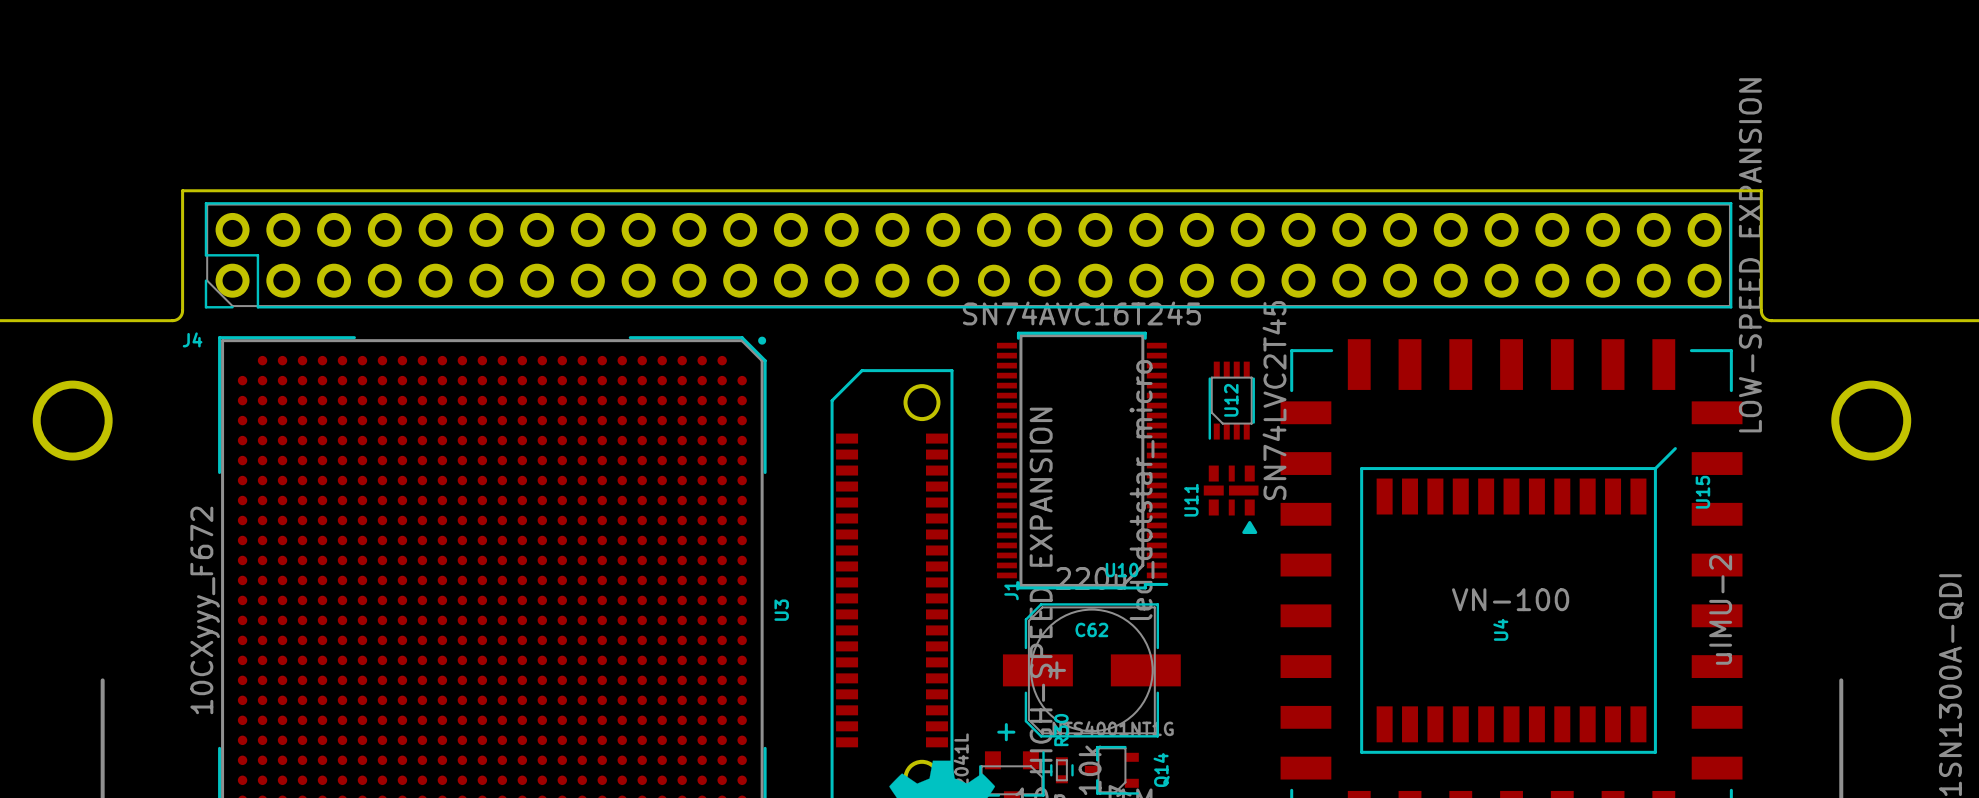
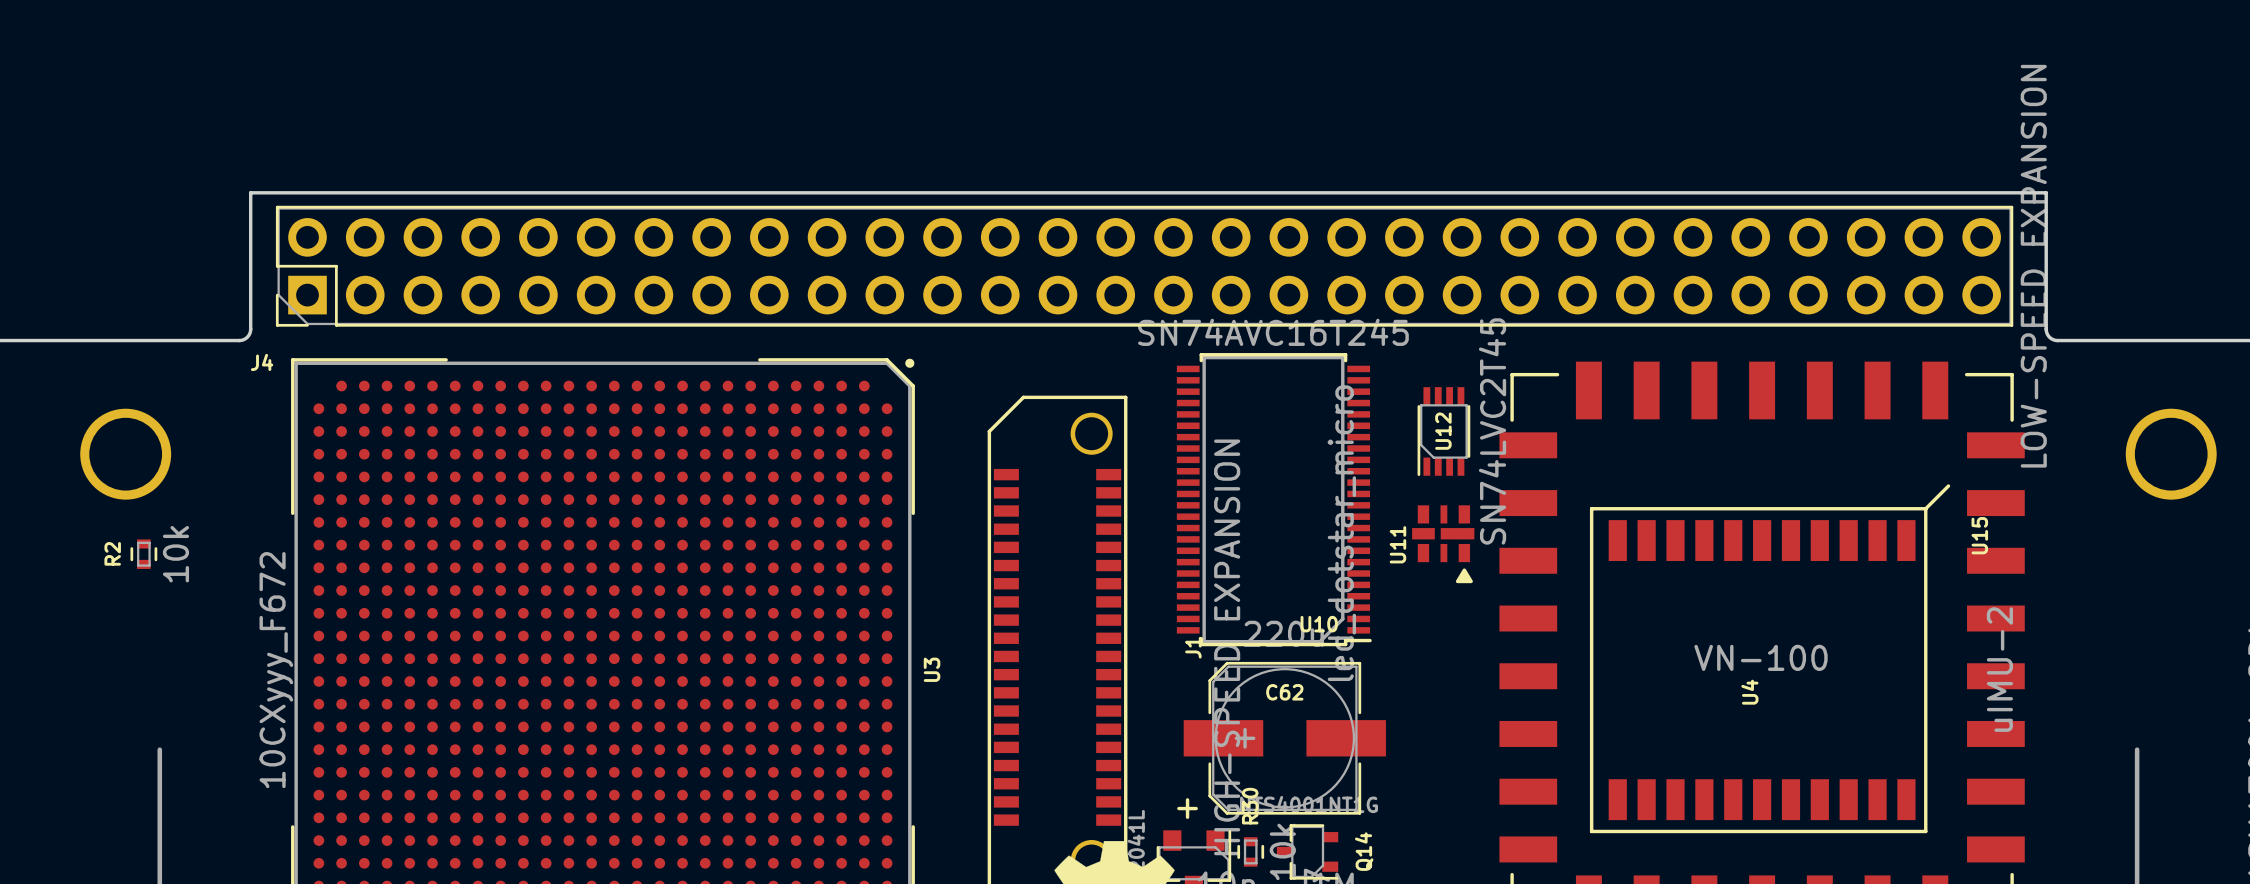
J4 footprint: [204, 202, 1733, 309] -> [275, 205, 2014, 327]
R2: none -> 10k (143, 554)

